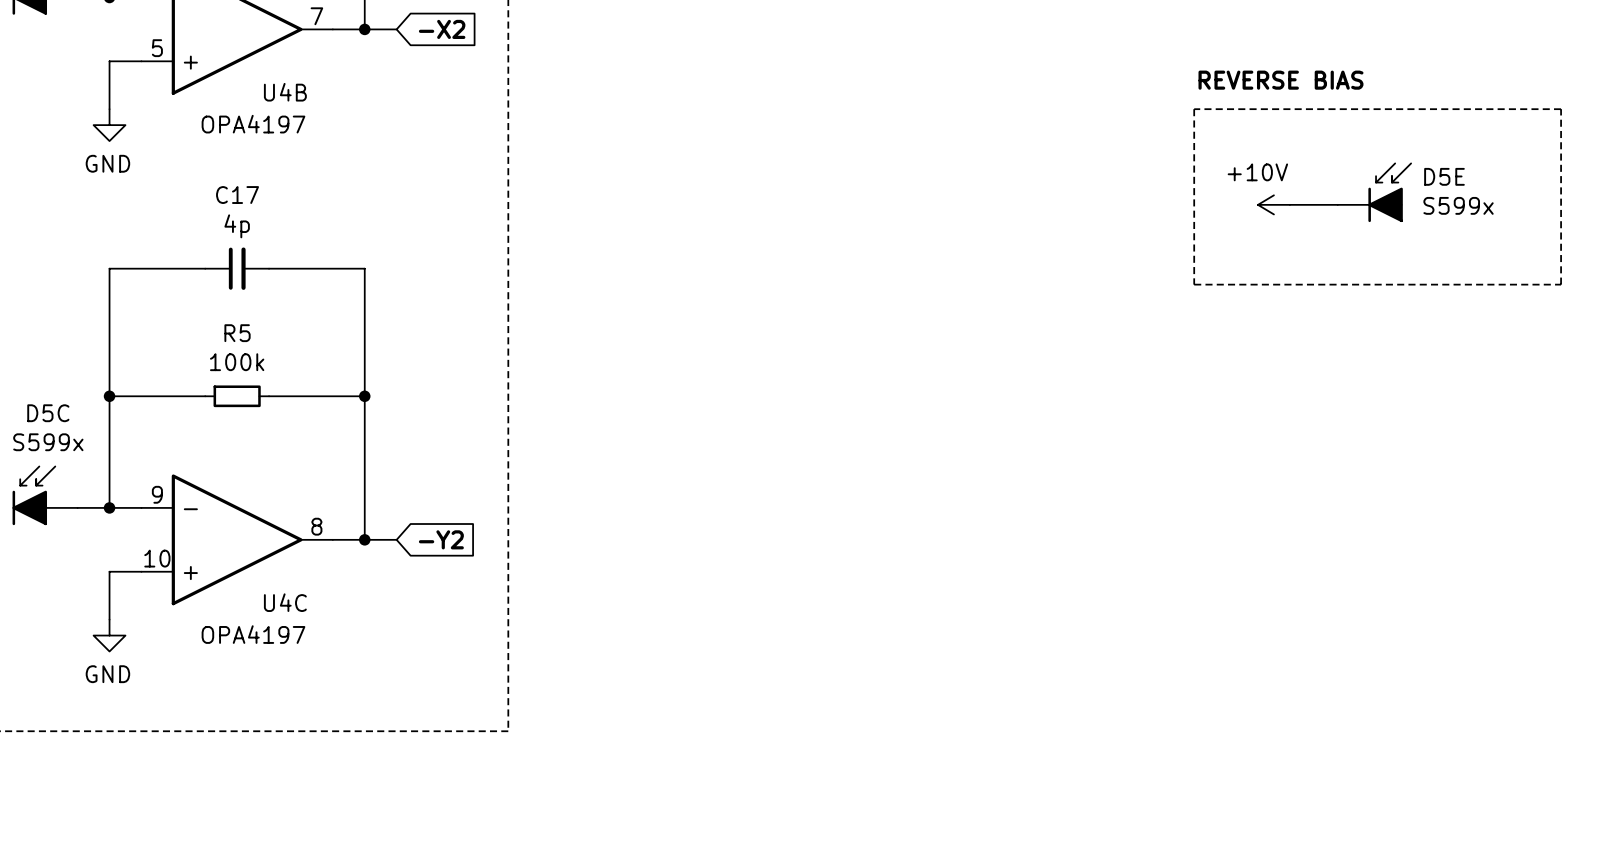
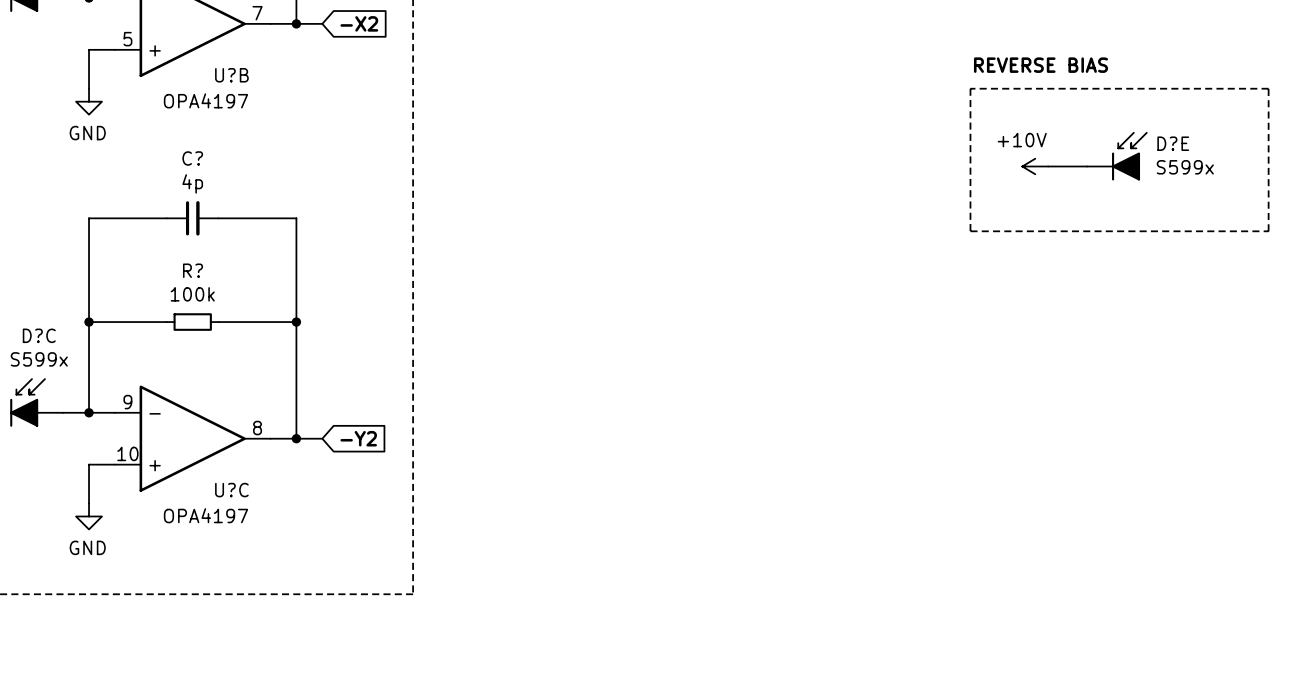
U4B name: U4B (285, 92) -> U?B (231, 75)
D5E name: D5E (1444, 176) -> D?E (1173, 143)
C17 name: C17 (237, 195) -> C? (192, 158)
R5 name: R5 (237, 333) -> R? (193, 270)
D5C name: D5C (48, 413) -> D?C (39, 335)
U4C name: U4C (285, 602) -> U?C (231, 490)

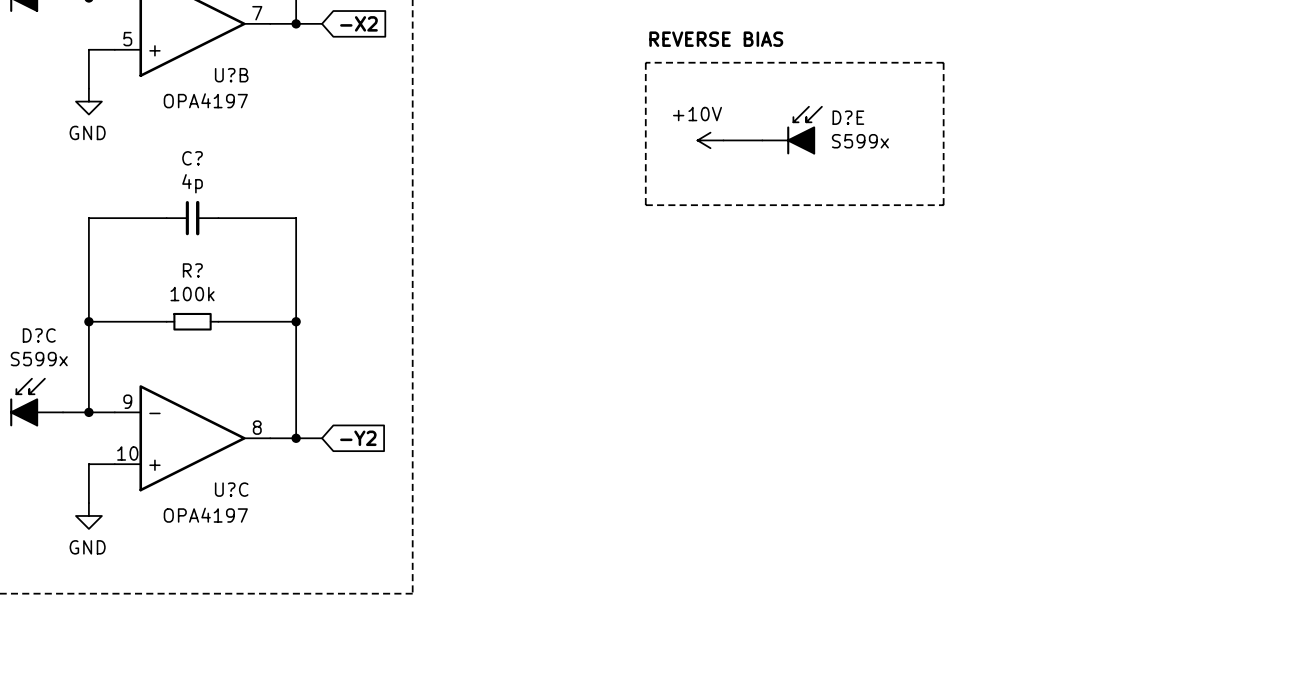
text: none -> REVERSE BIAS (716, 39)
line: none -> (645, 62) (645, 205) (943, 205) (943, 62) (645, 62)
text: REVERSE BIAS (1041, 65) -> none
line: (970, 88) (970, 231) (1268, 231) (1268, 88) (970, 88) -> none
D?E: none -> S599x (792, 130)
power symbol: none -> +10V (710, 140)
wire: none -> (723, 140) (762, 140)
D?E: S599x (1116, 156) -> none
power symbol: +10V (1035, 166) -> none
wire: (1048, 166) (1087, 166) -> none

